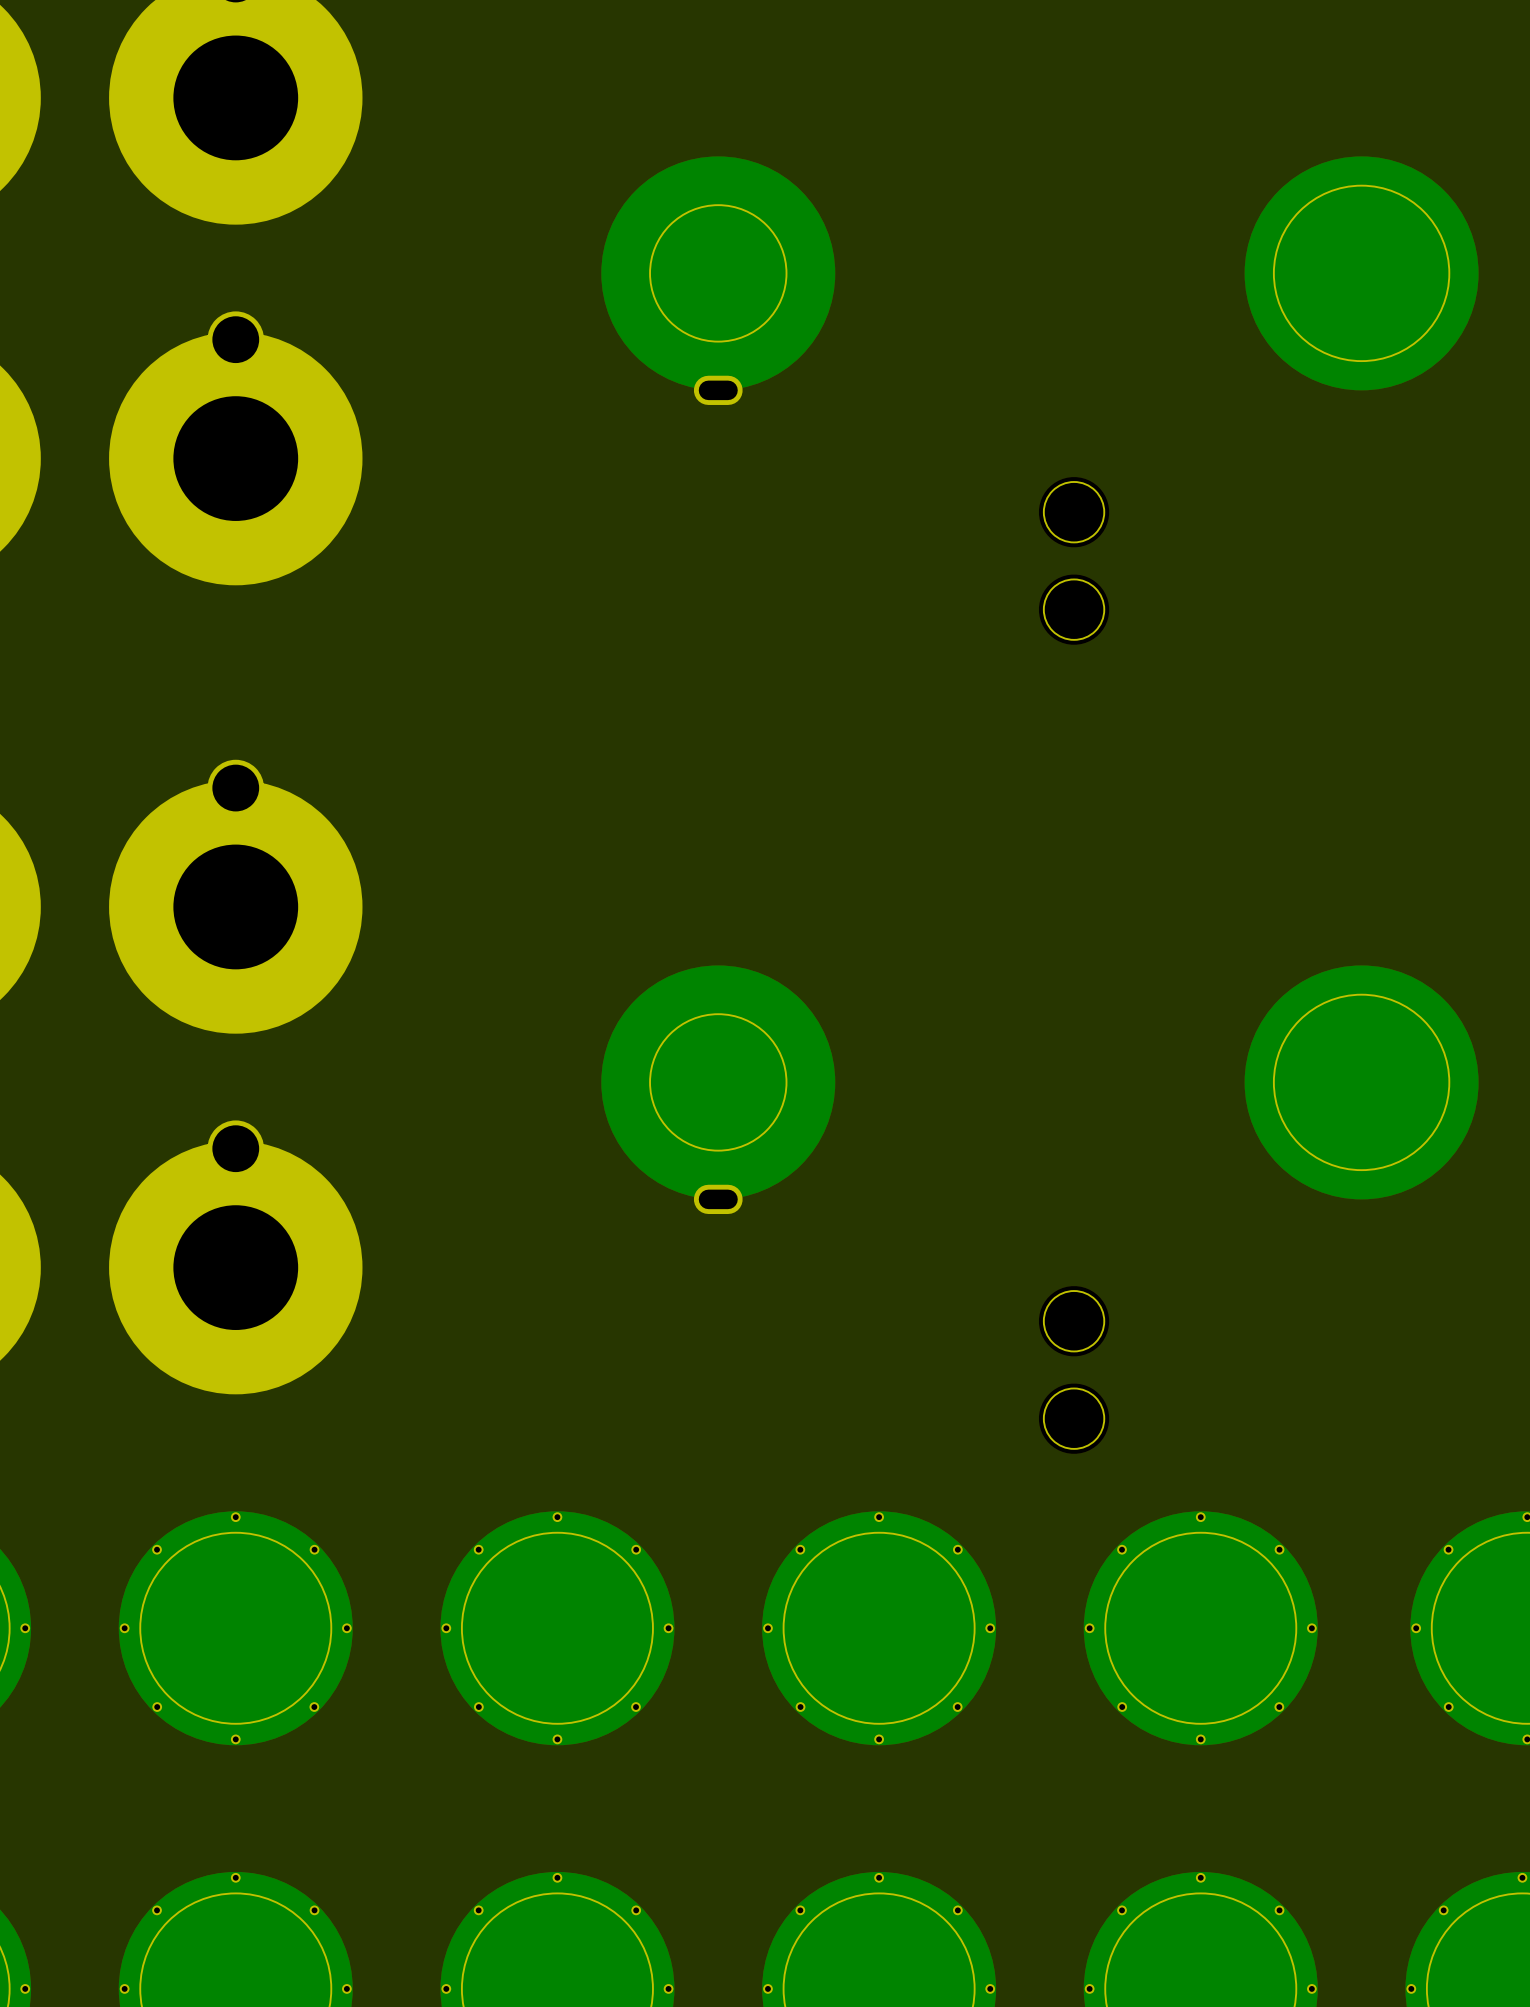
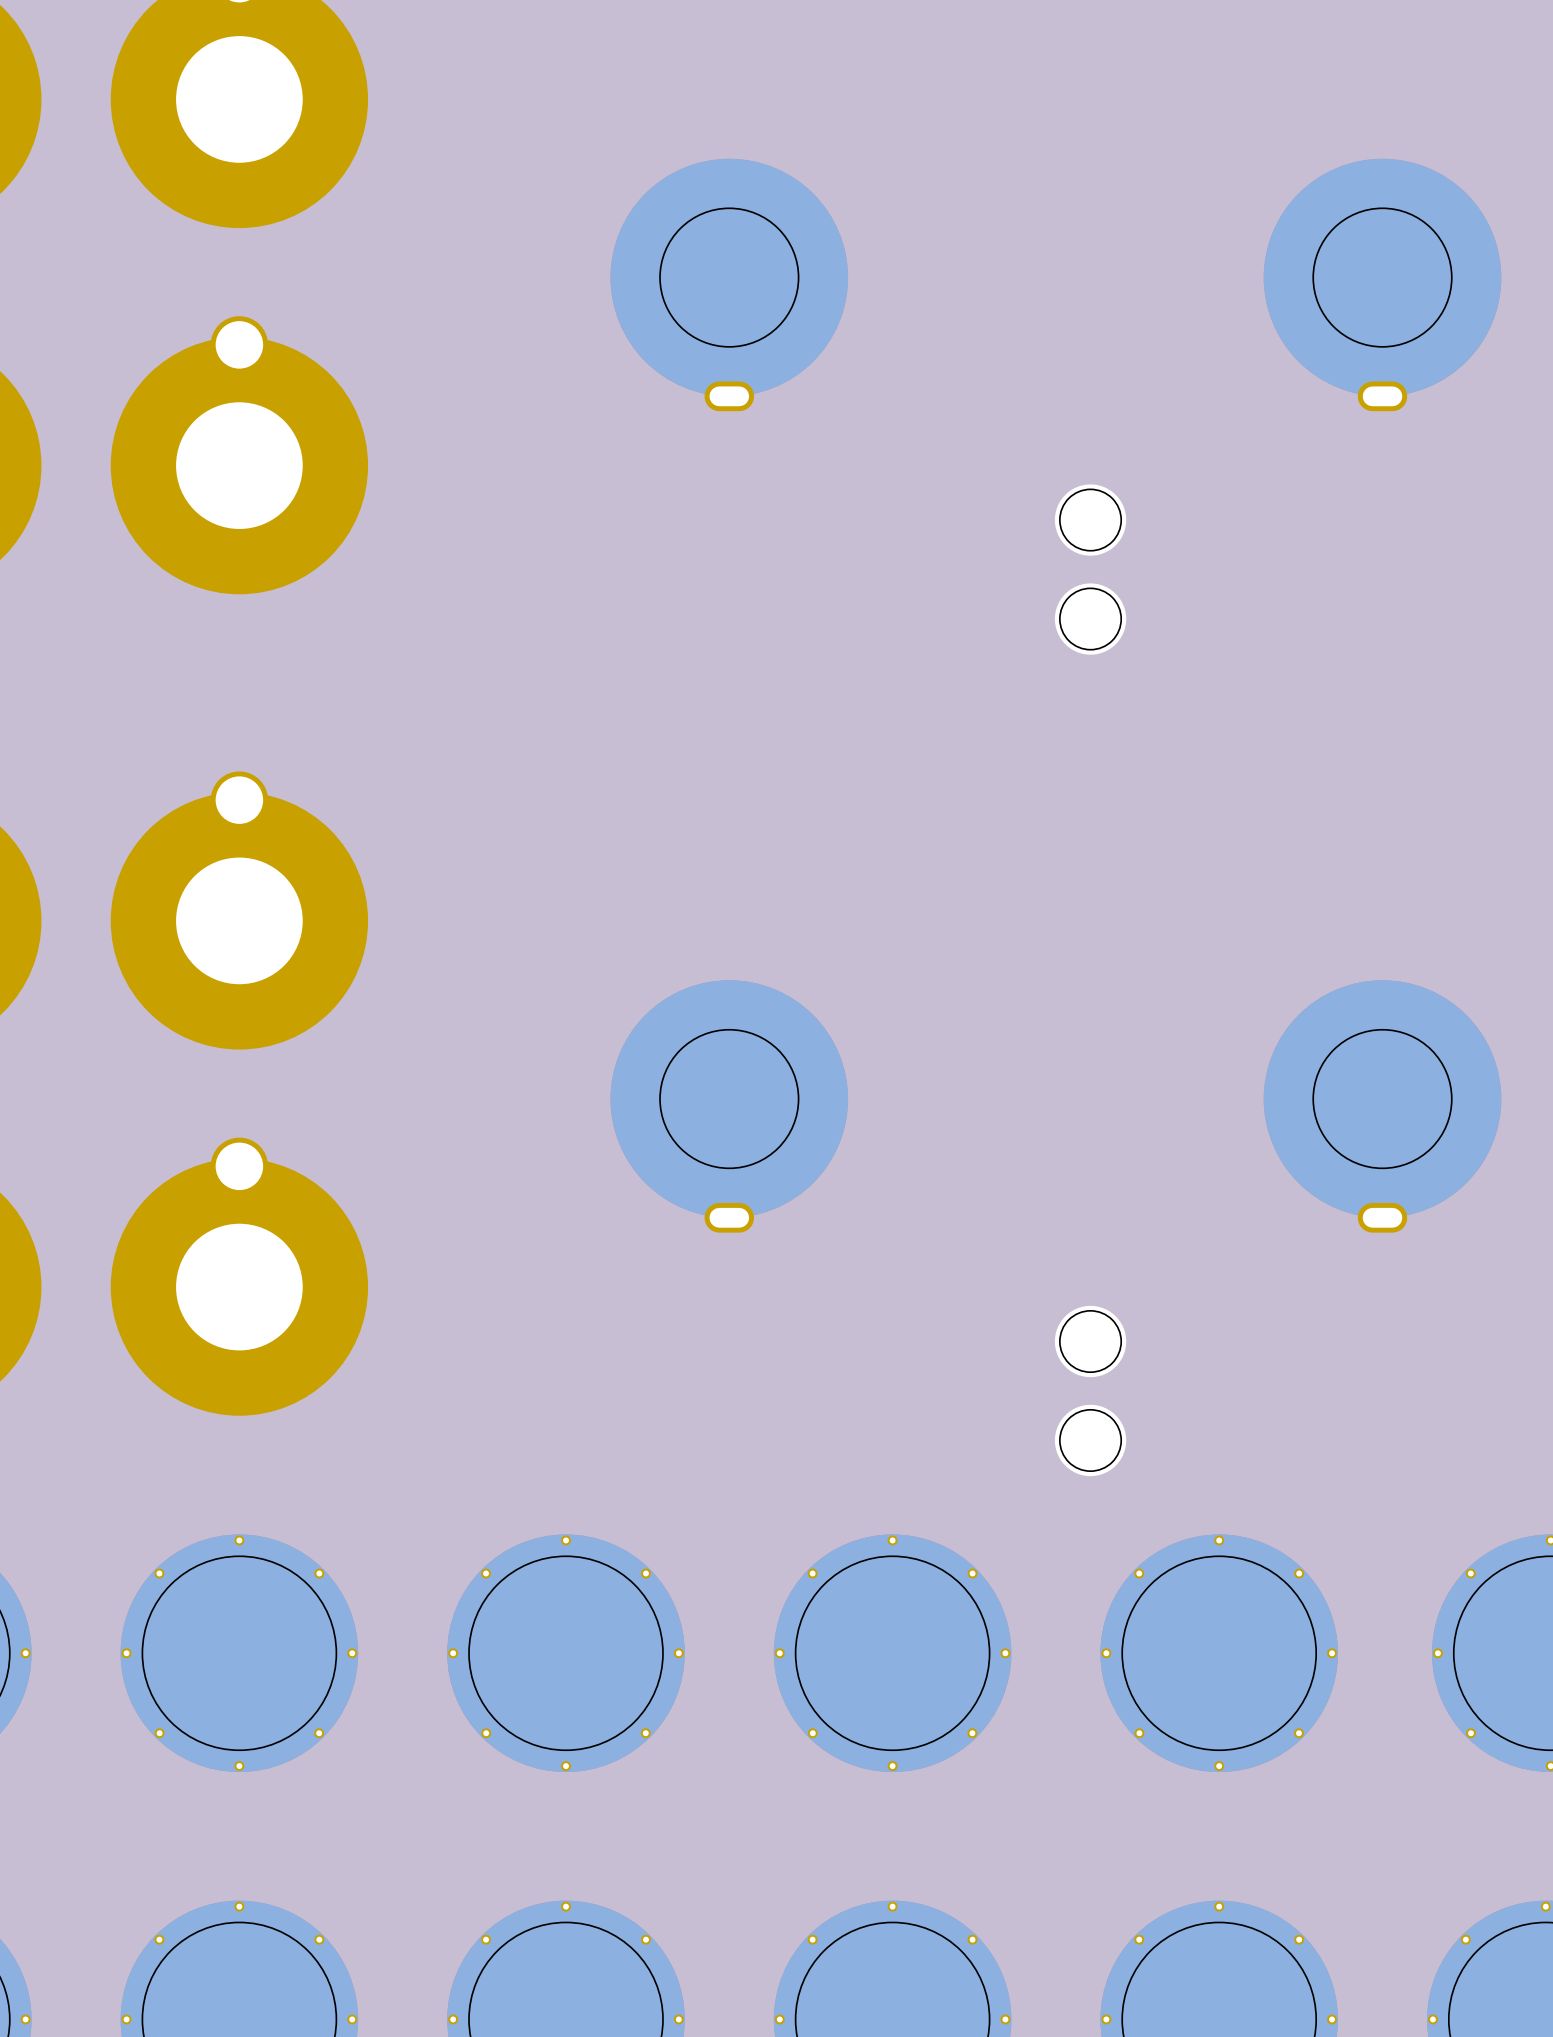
part footprint: [1244, 156, 1479, 391] -> [1263, 158, 1502, 412]
part footprint: [1244, 965, 1479, 1200] -> [1263, 980, 1502, 1233]

